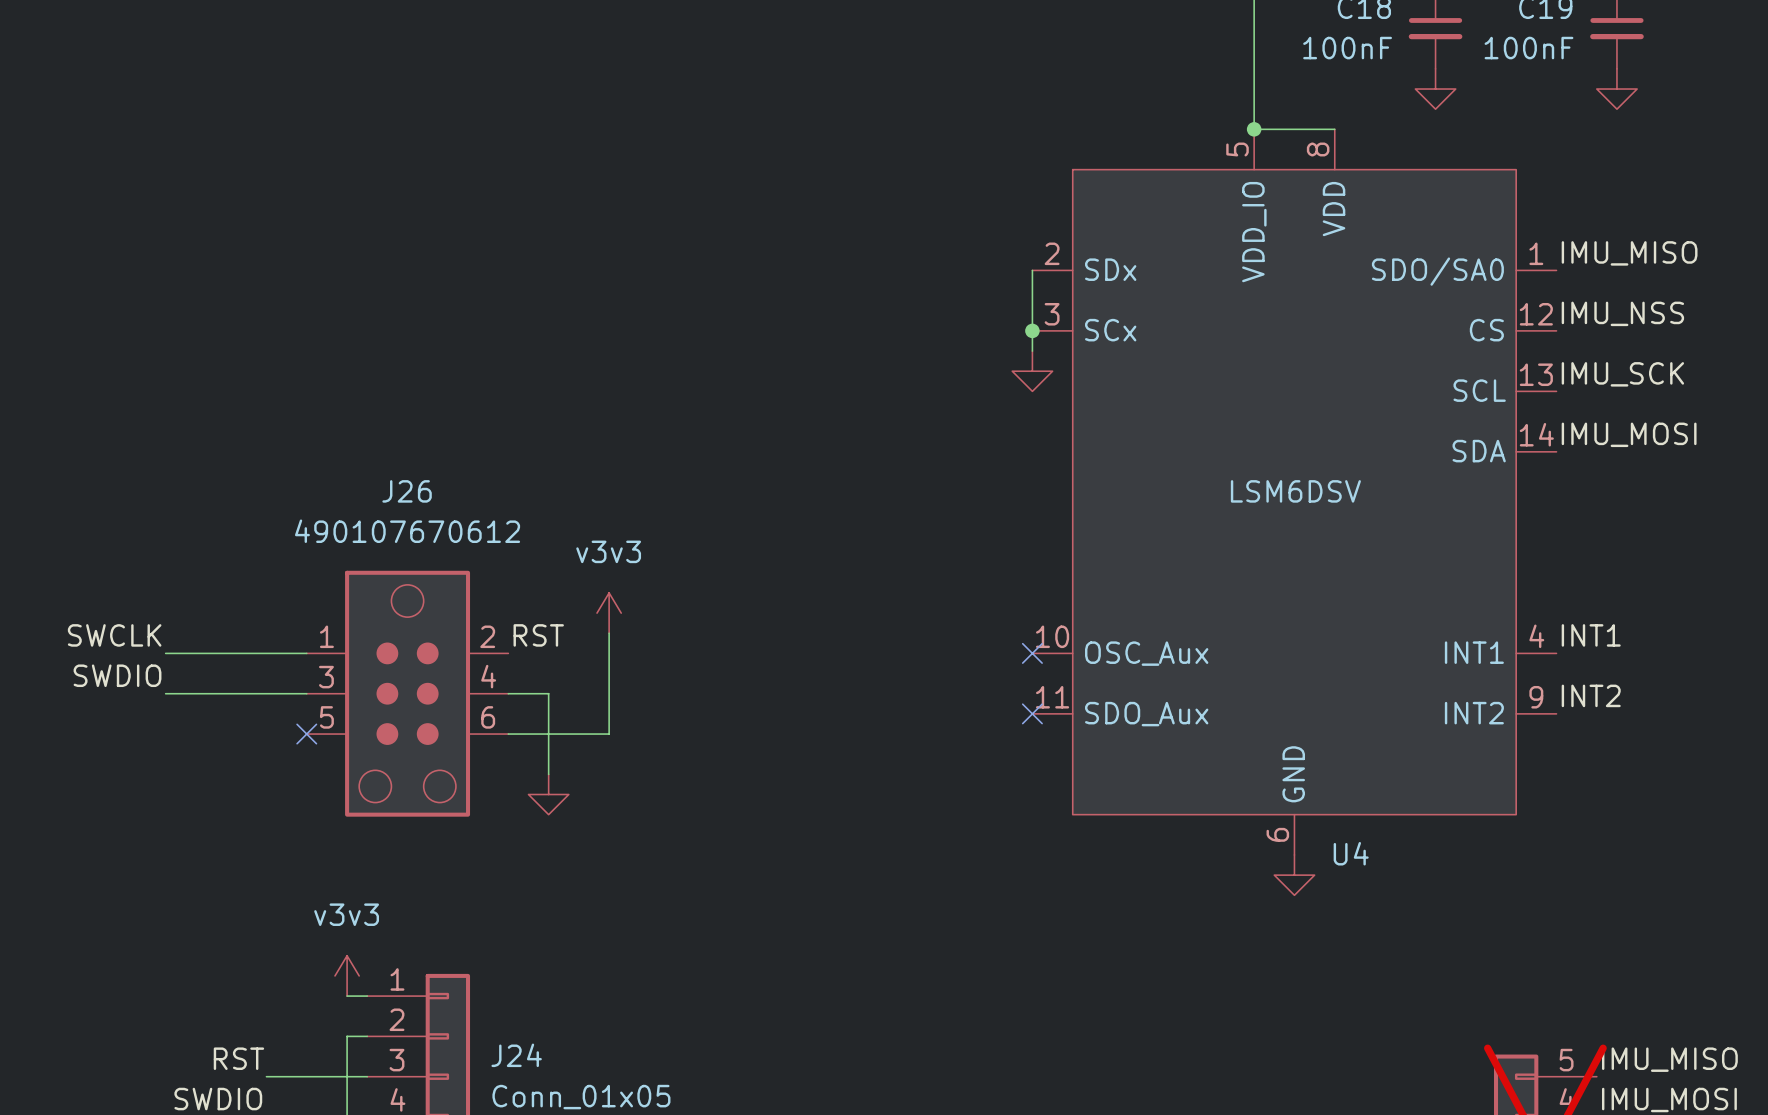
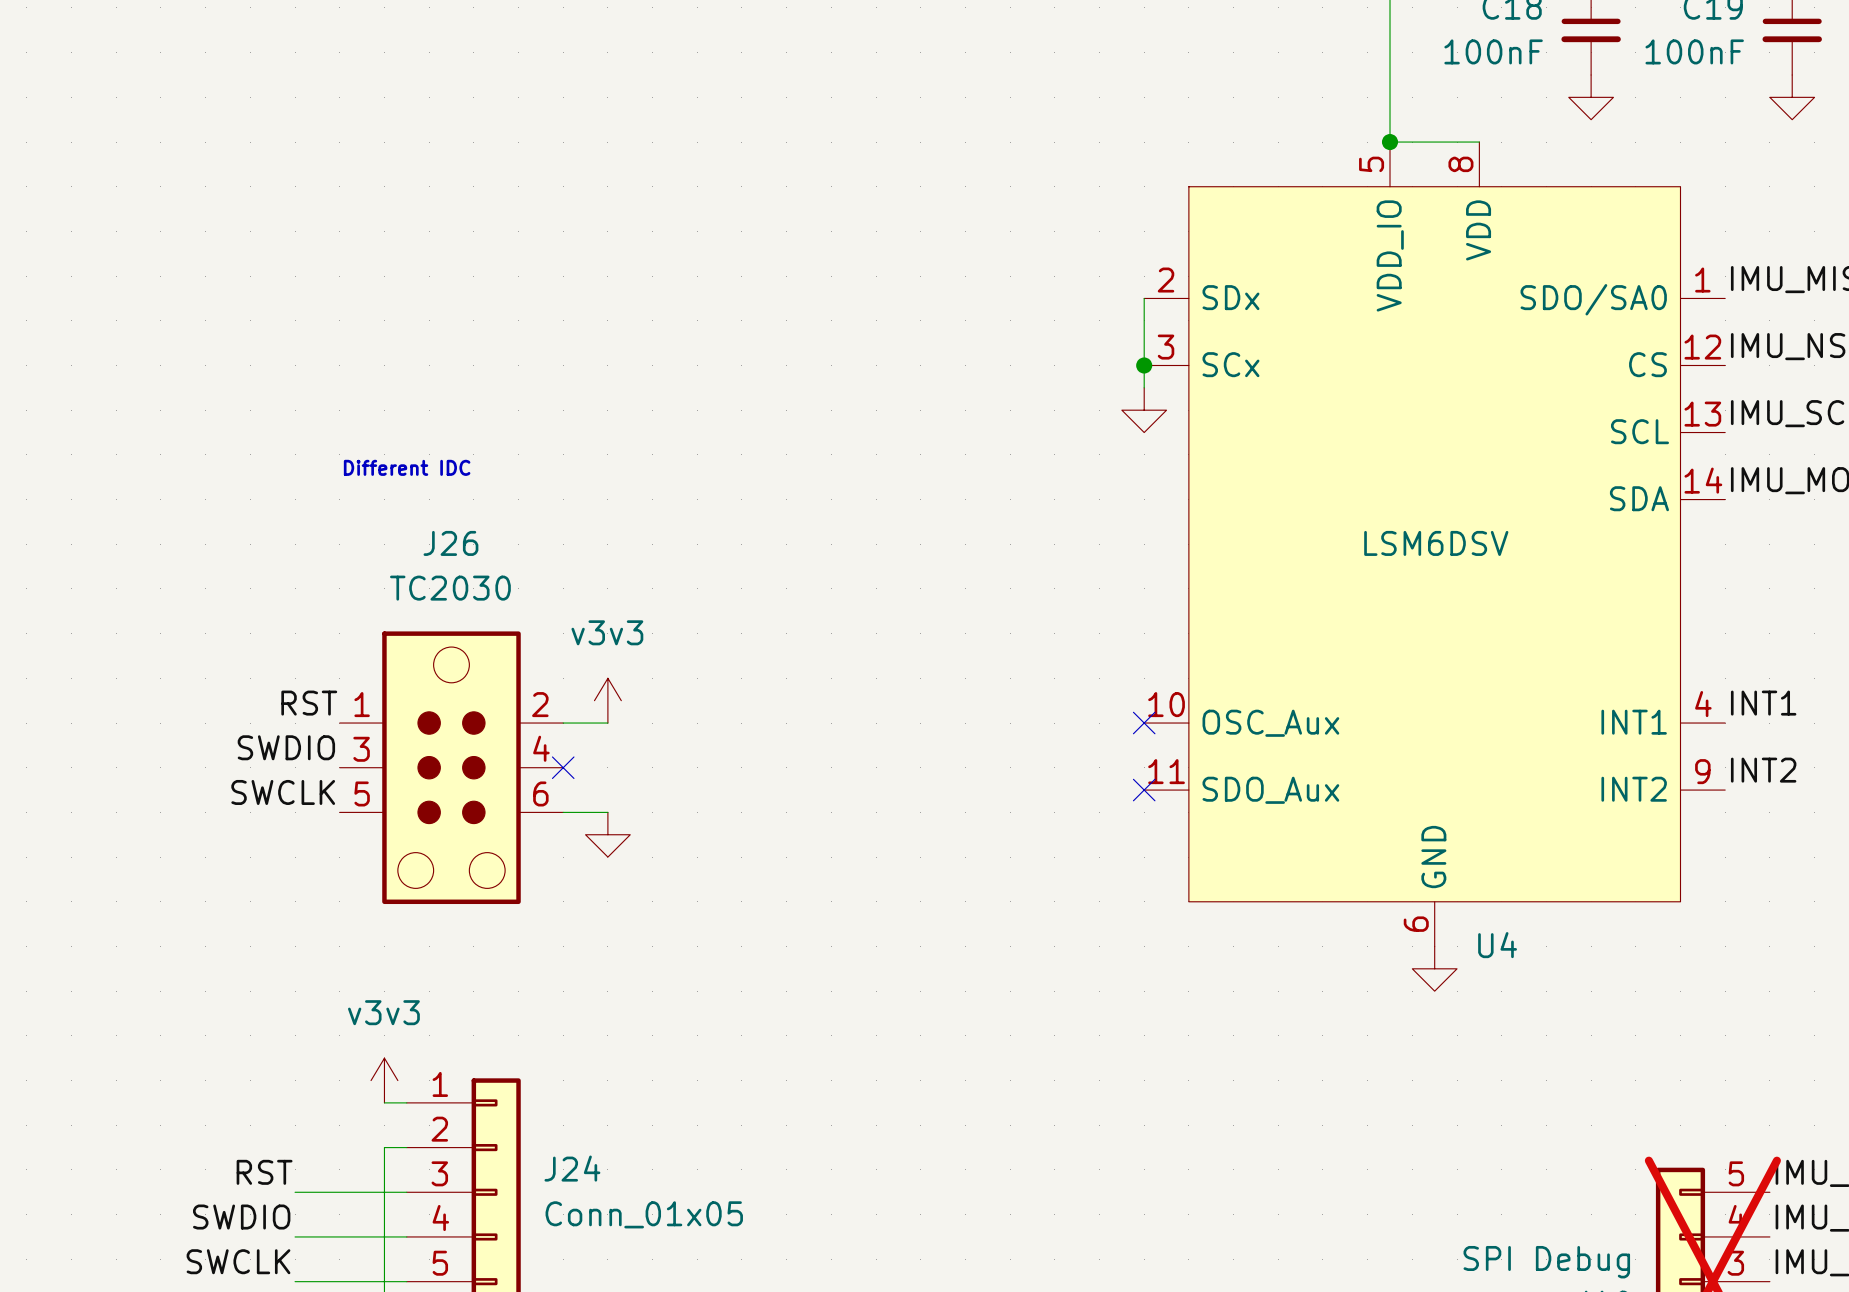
text: none -> Different IDC (407, 467)
J26 value: 490107670612 (407, 531) -> TC2030 (450, 588)
power symbol position: v3v3 (609, 613) -> v3v3 (607, 700)
wire: (609, 633) (609, 734) (548, 734) -> none
label position: SWCLK (114, 635) -> SWCLK (283, 792)
label position: RST (538, 635) -> RST (309, 703)
wire: (165, 653) (306, 653) -> none
wire: none -> (563, 723) (607, 723)
label position: SWDIO (117, 675) -> SWDIO (286, 747)
wire: (165, 693) (306, 693) -> none
wire: (508, 693) (548, 693) (548, 774) -> none
no-connect mark: none -> (563, 767)
no-connect mark: (306, 734) -> none
power symbol position: (548, 794) -> (607, 834)

